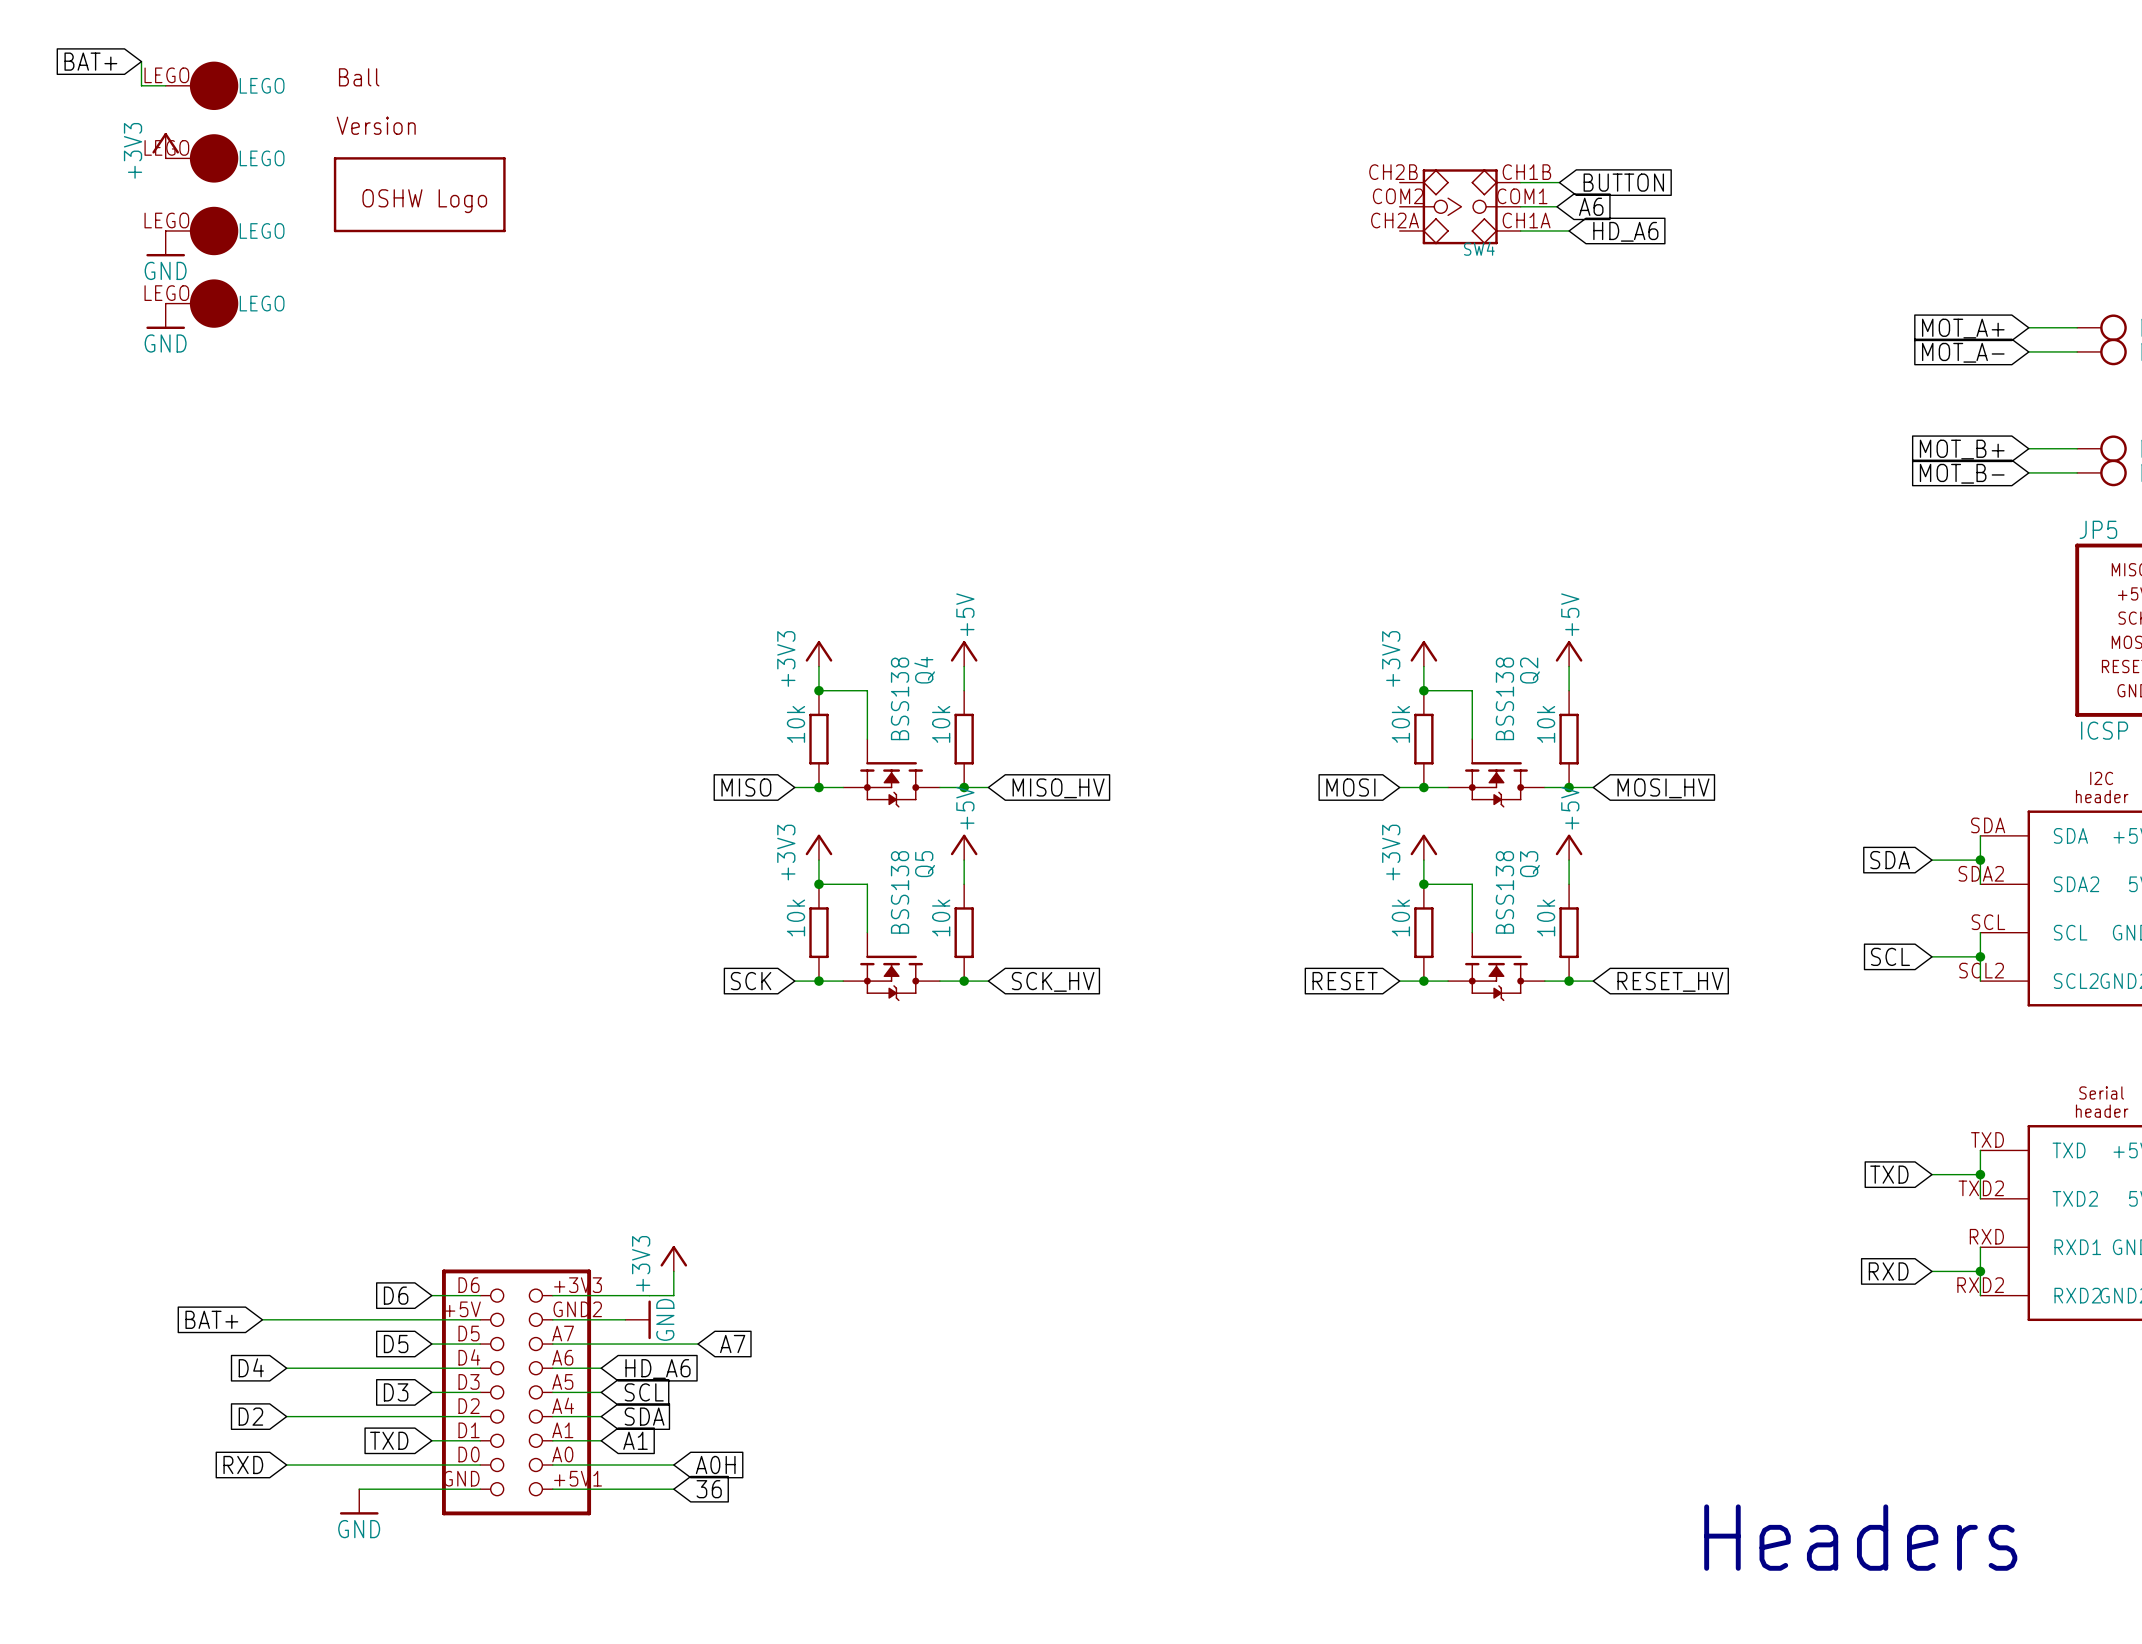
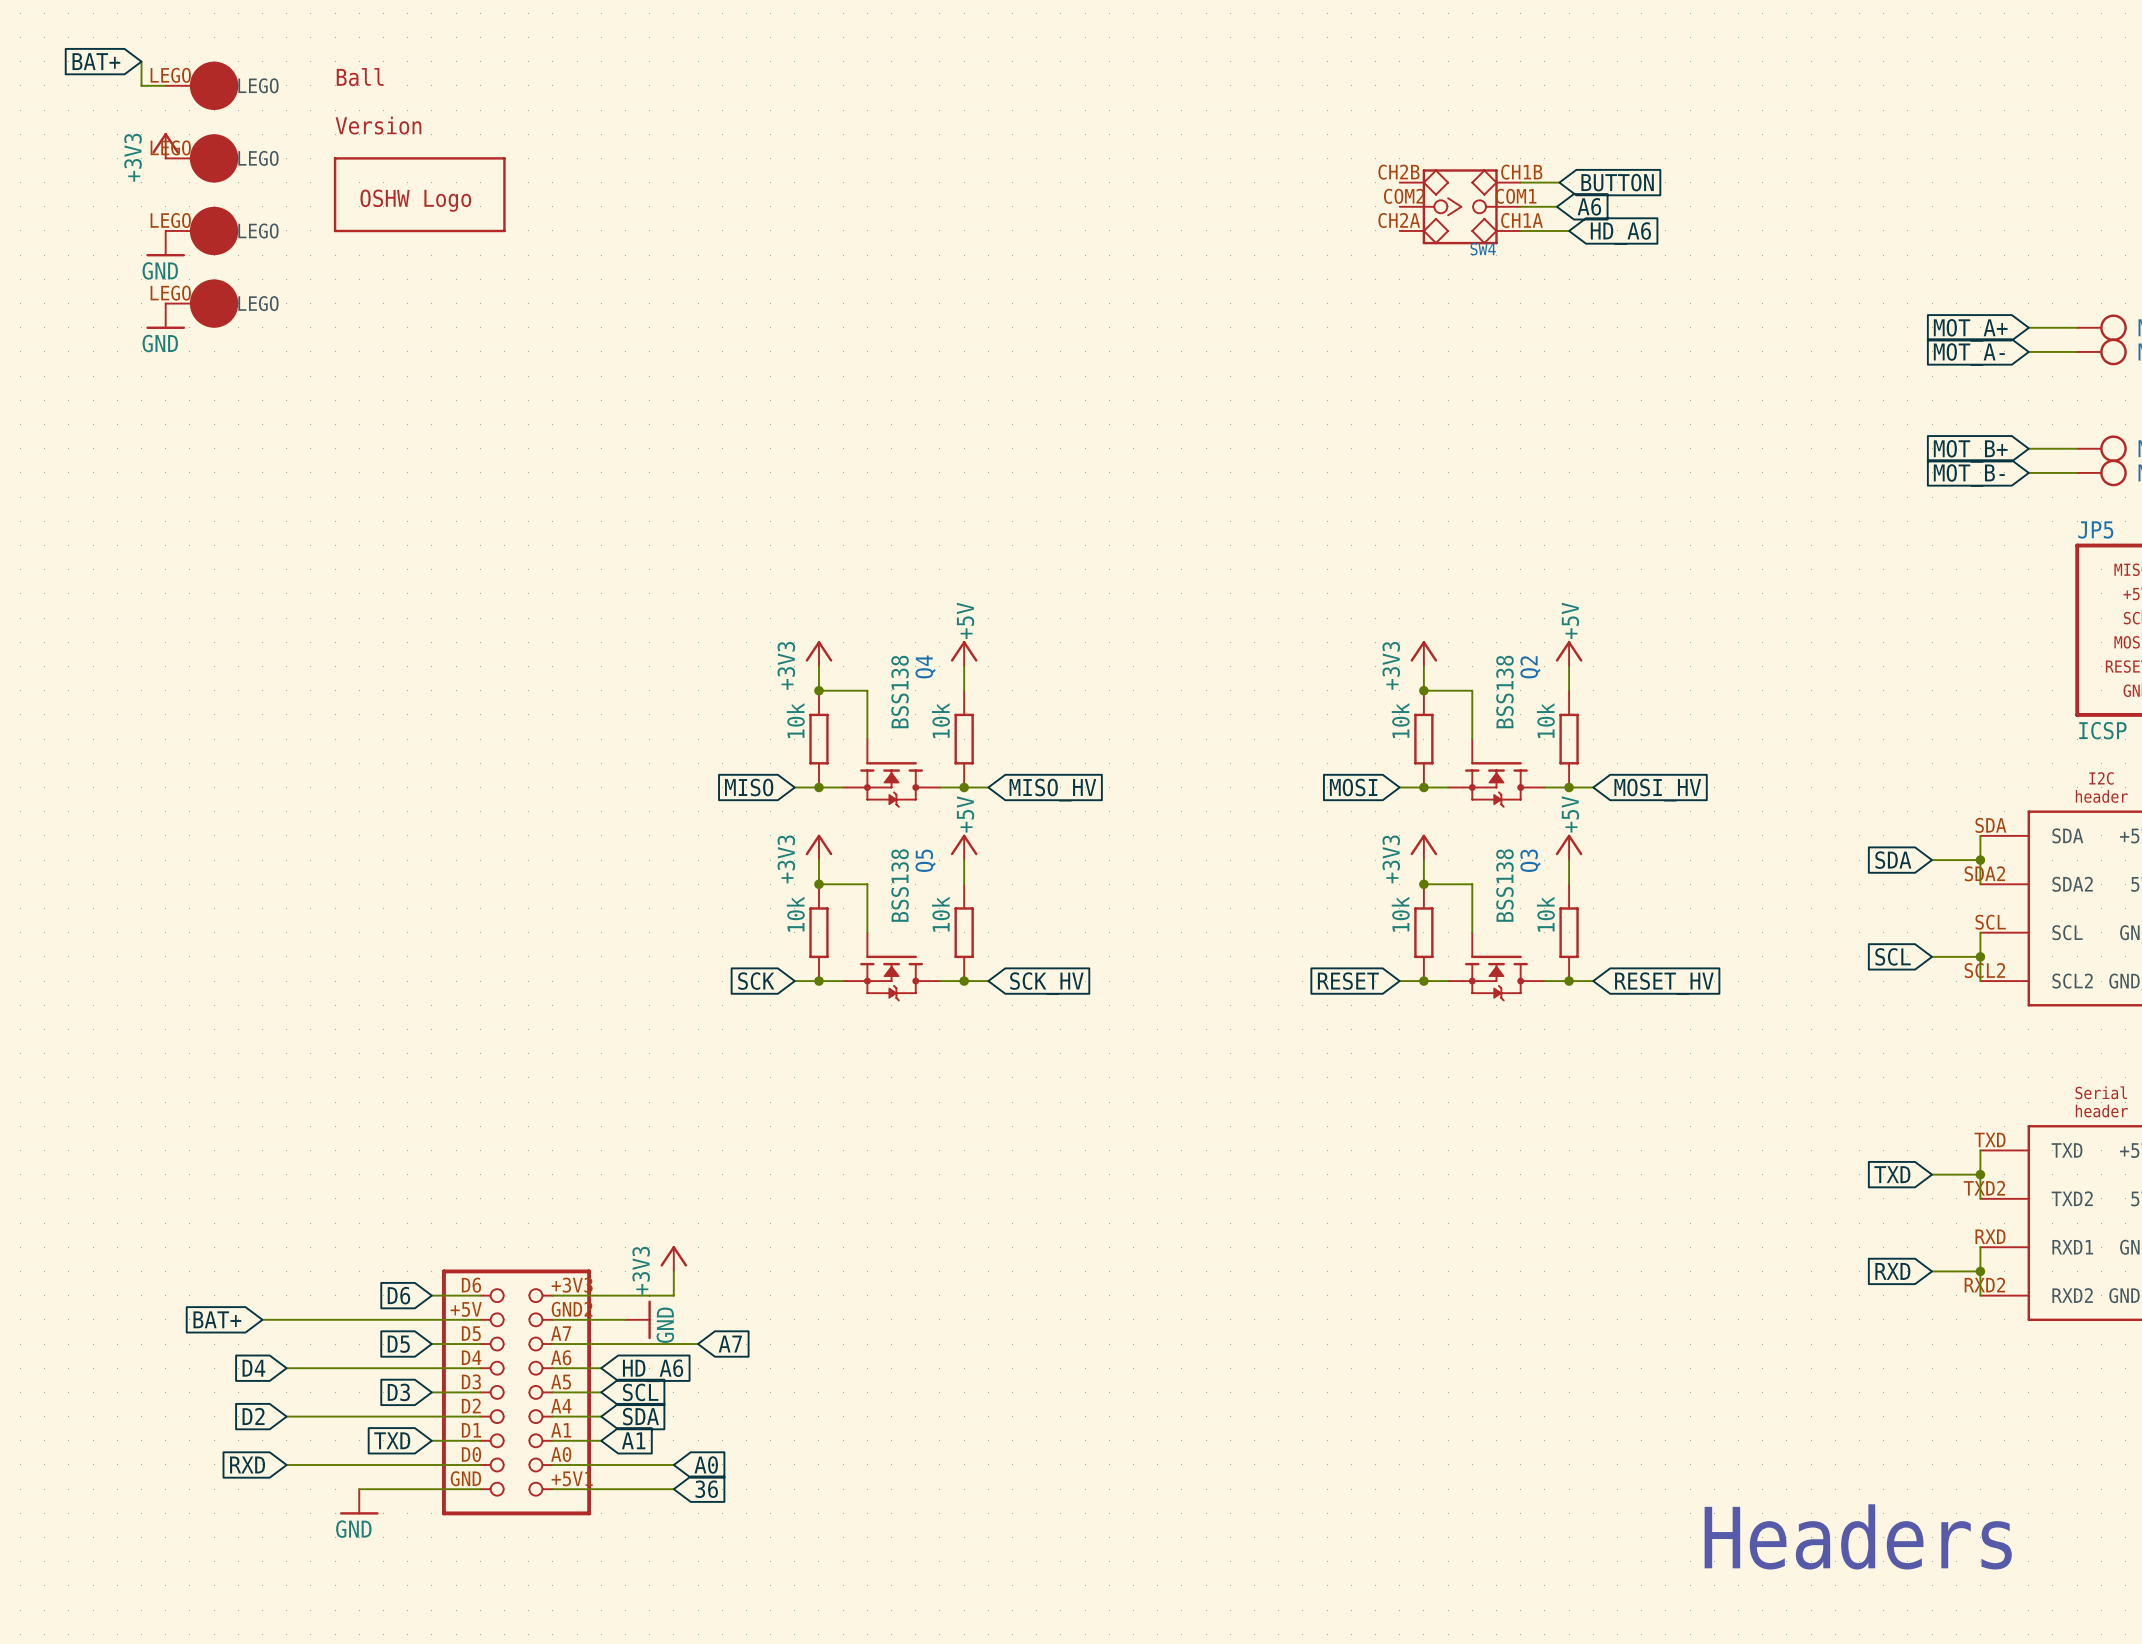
global label: A0H (715, 1464) -> A0 (706, 1465)

